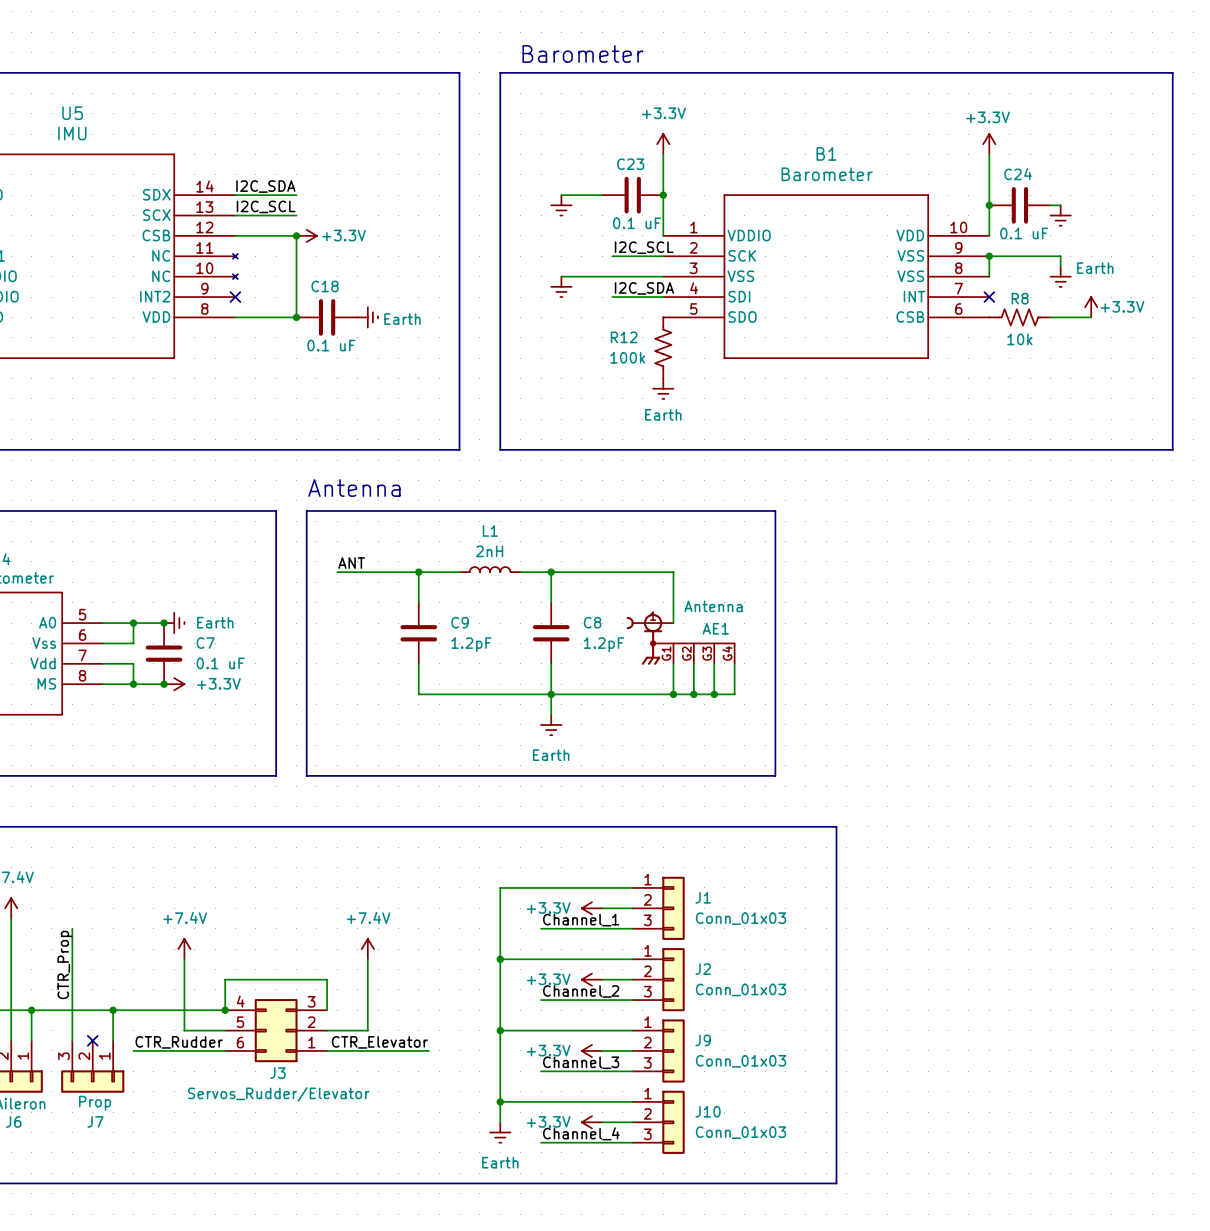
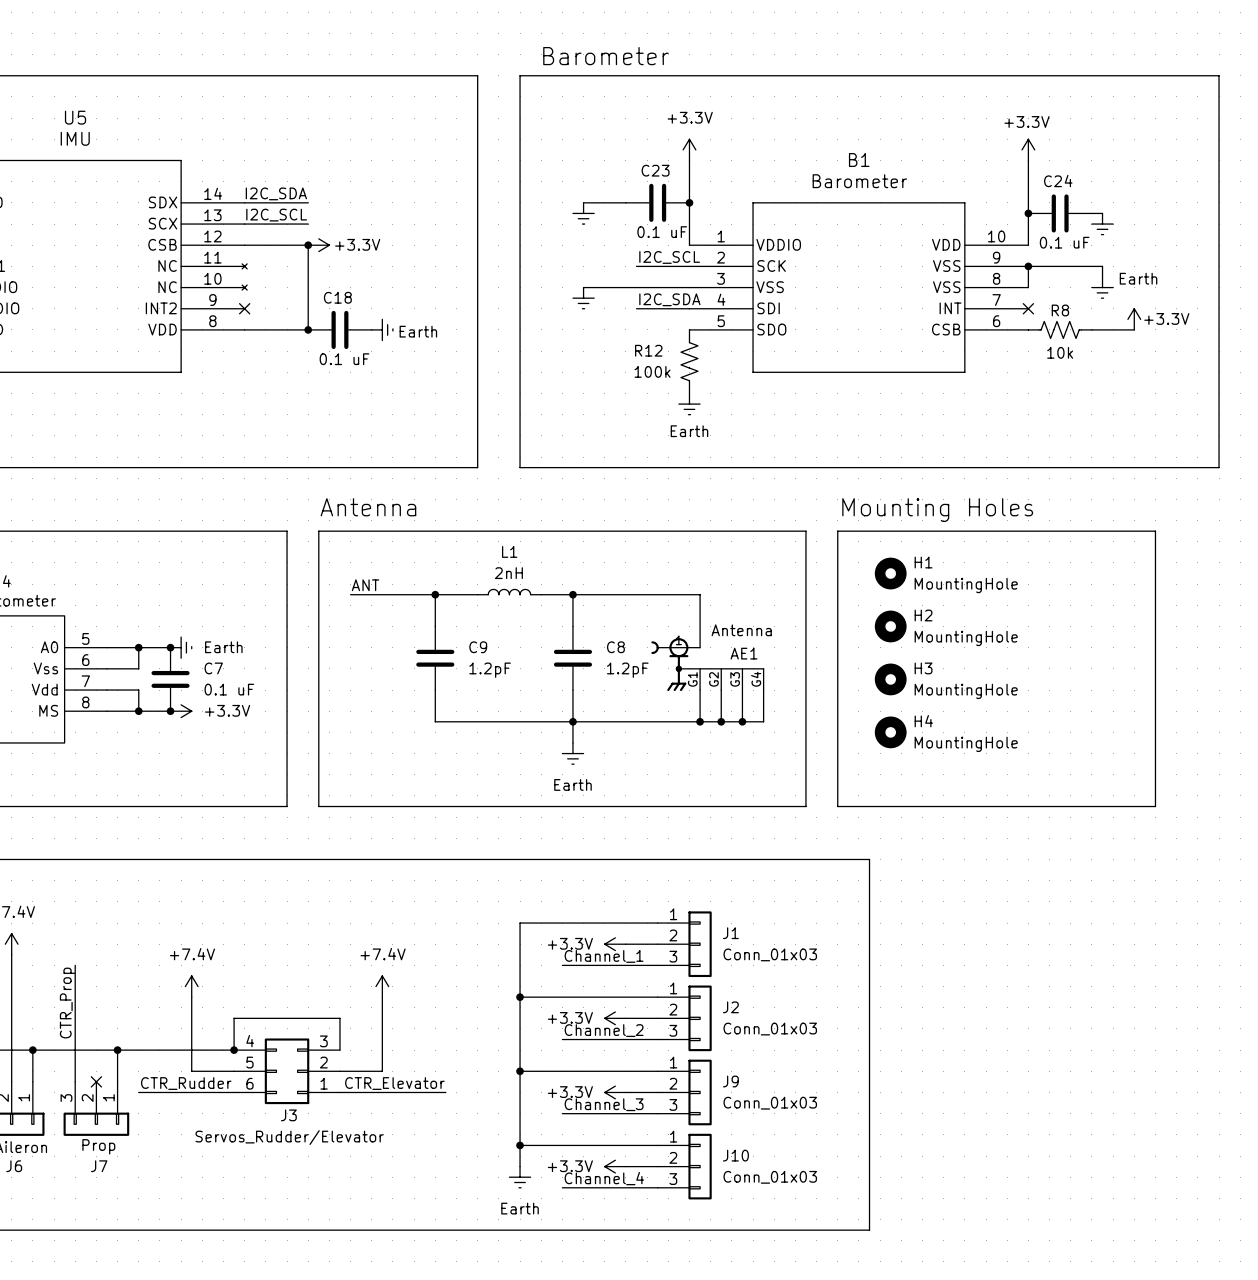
text: none -> Mounting Holes (937, 510)
line: none -> (837, 531) (1155, 531) (1155, 806) (837, 806) (837, 531)
H1: none -> MountingHole (890, 573)
H2: none -> MountingHole (890, 626)
H3: none -> MountingHole (890, 679)
H4: none -> MountingHole (890, 732)

